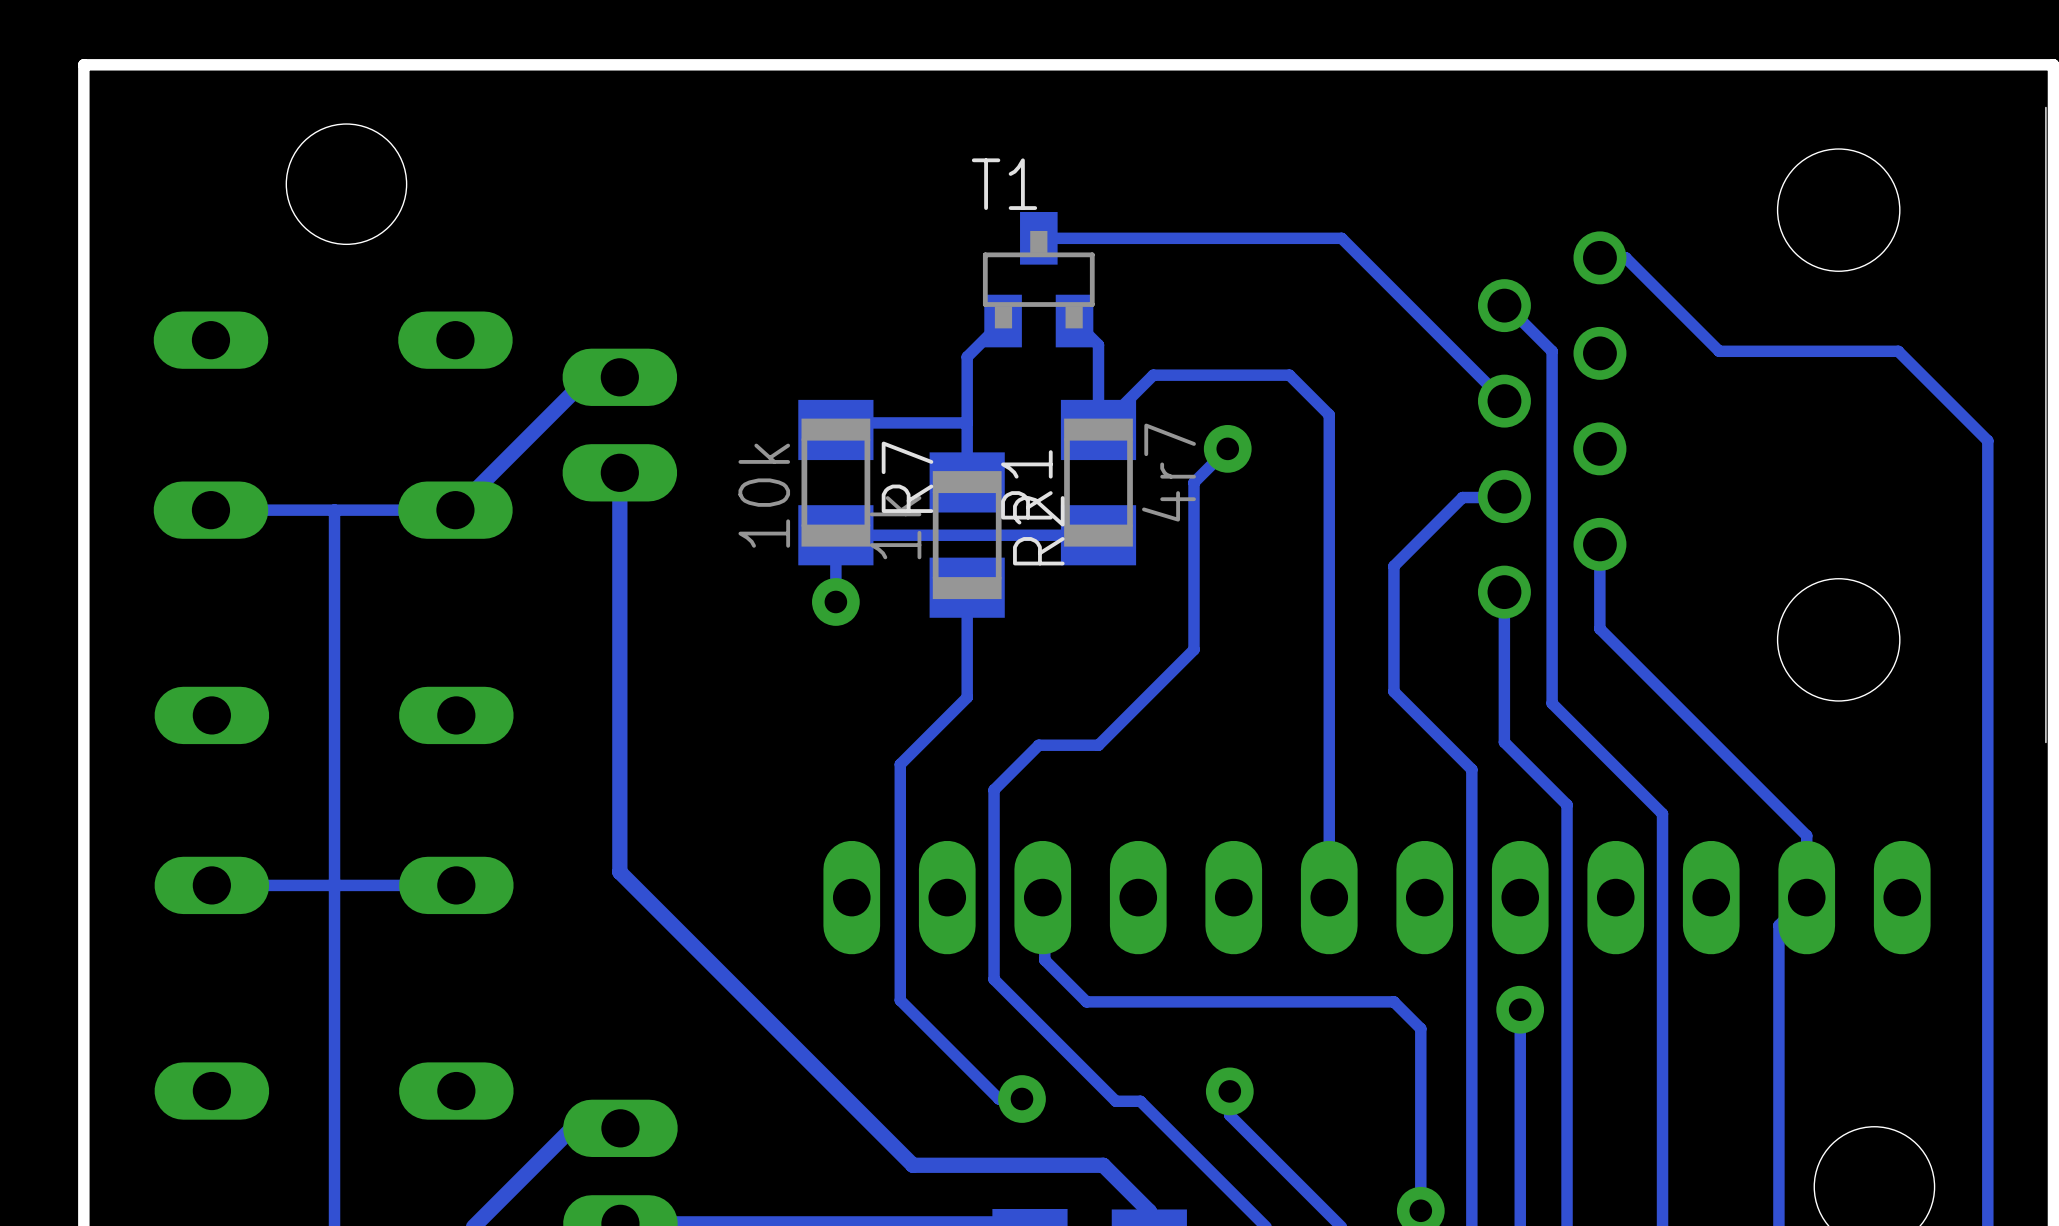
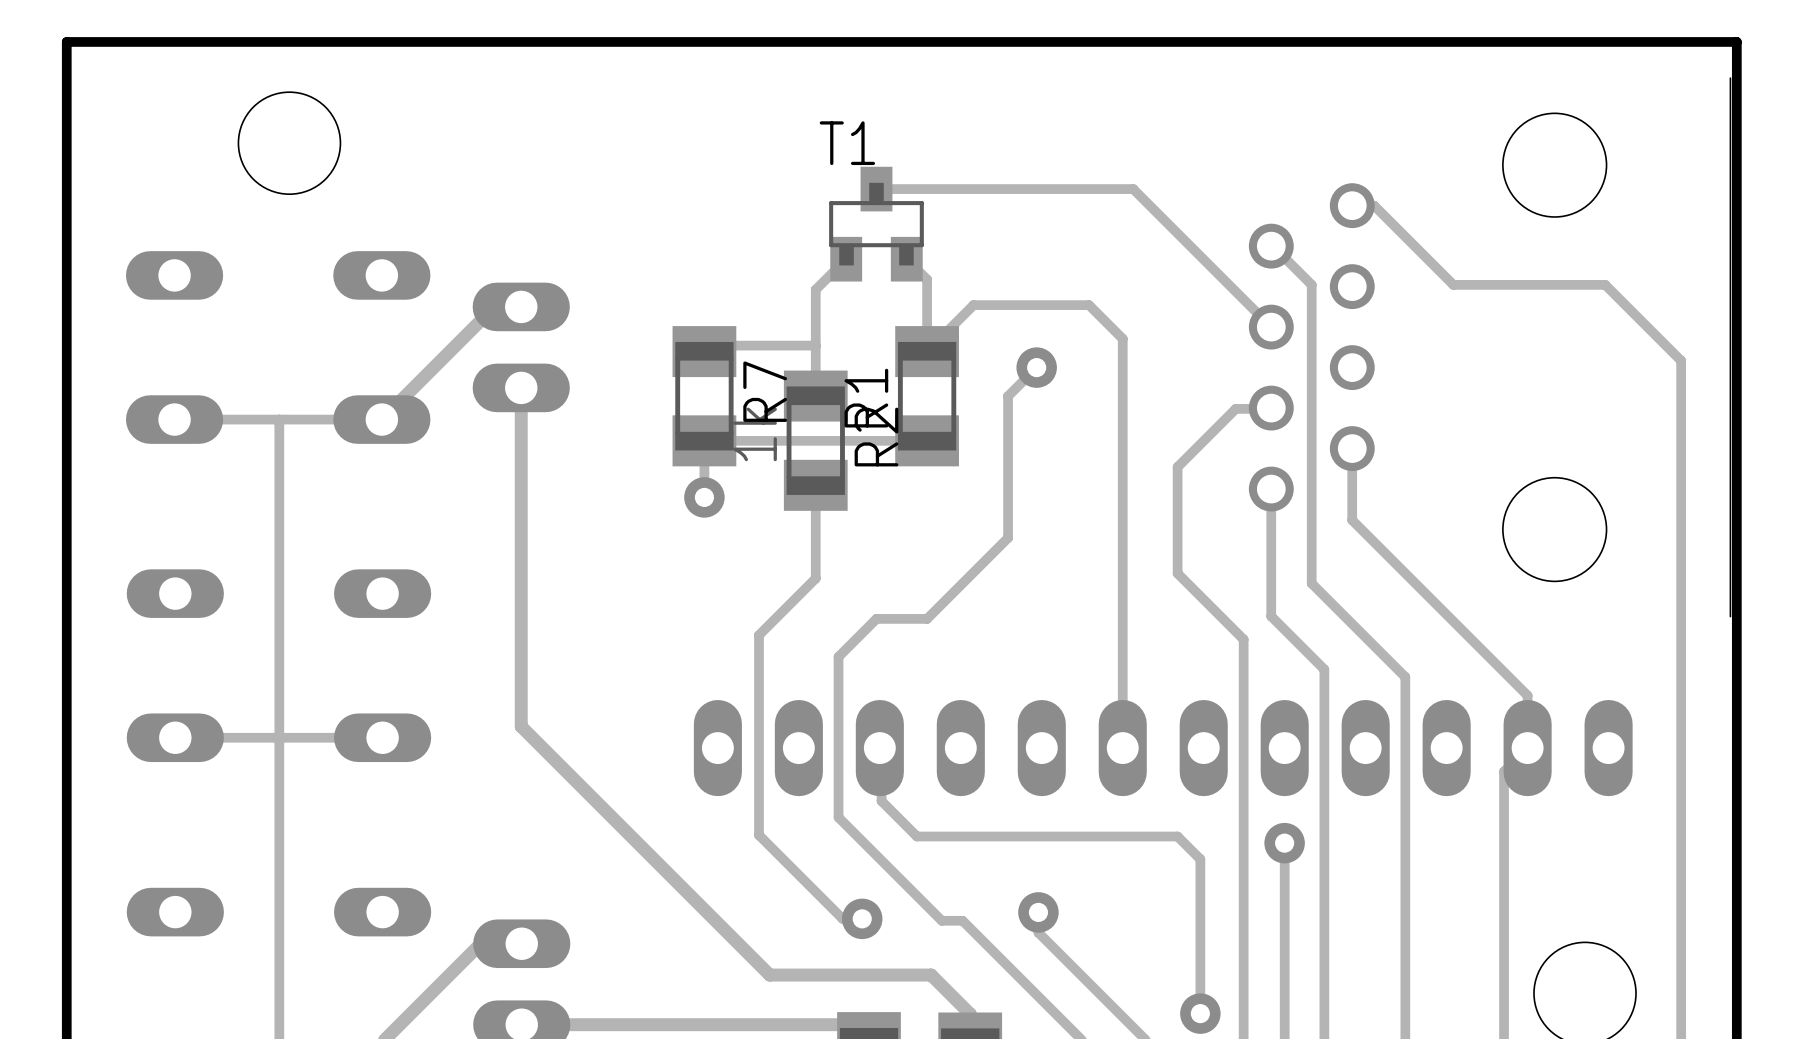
R1 value: 4r7 (1168, 472) -> none
R7 value: 10k (764, 495) -> none

